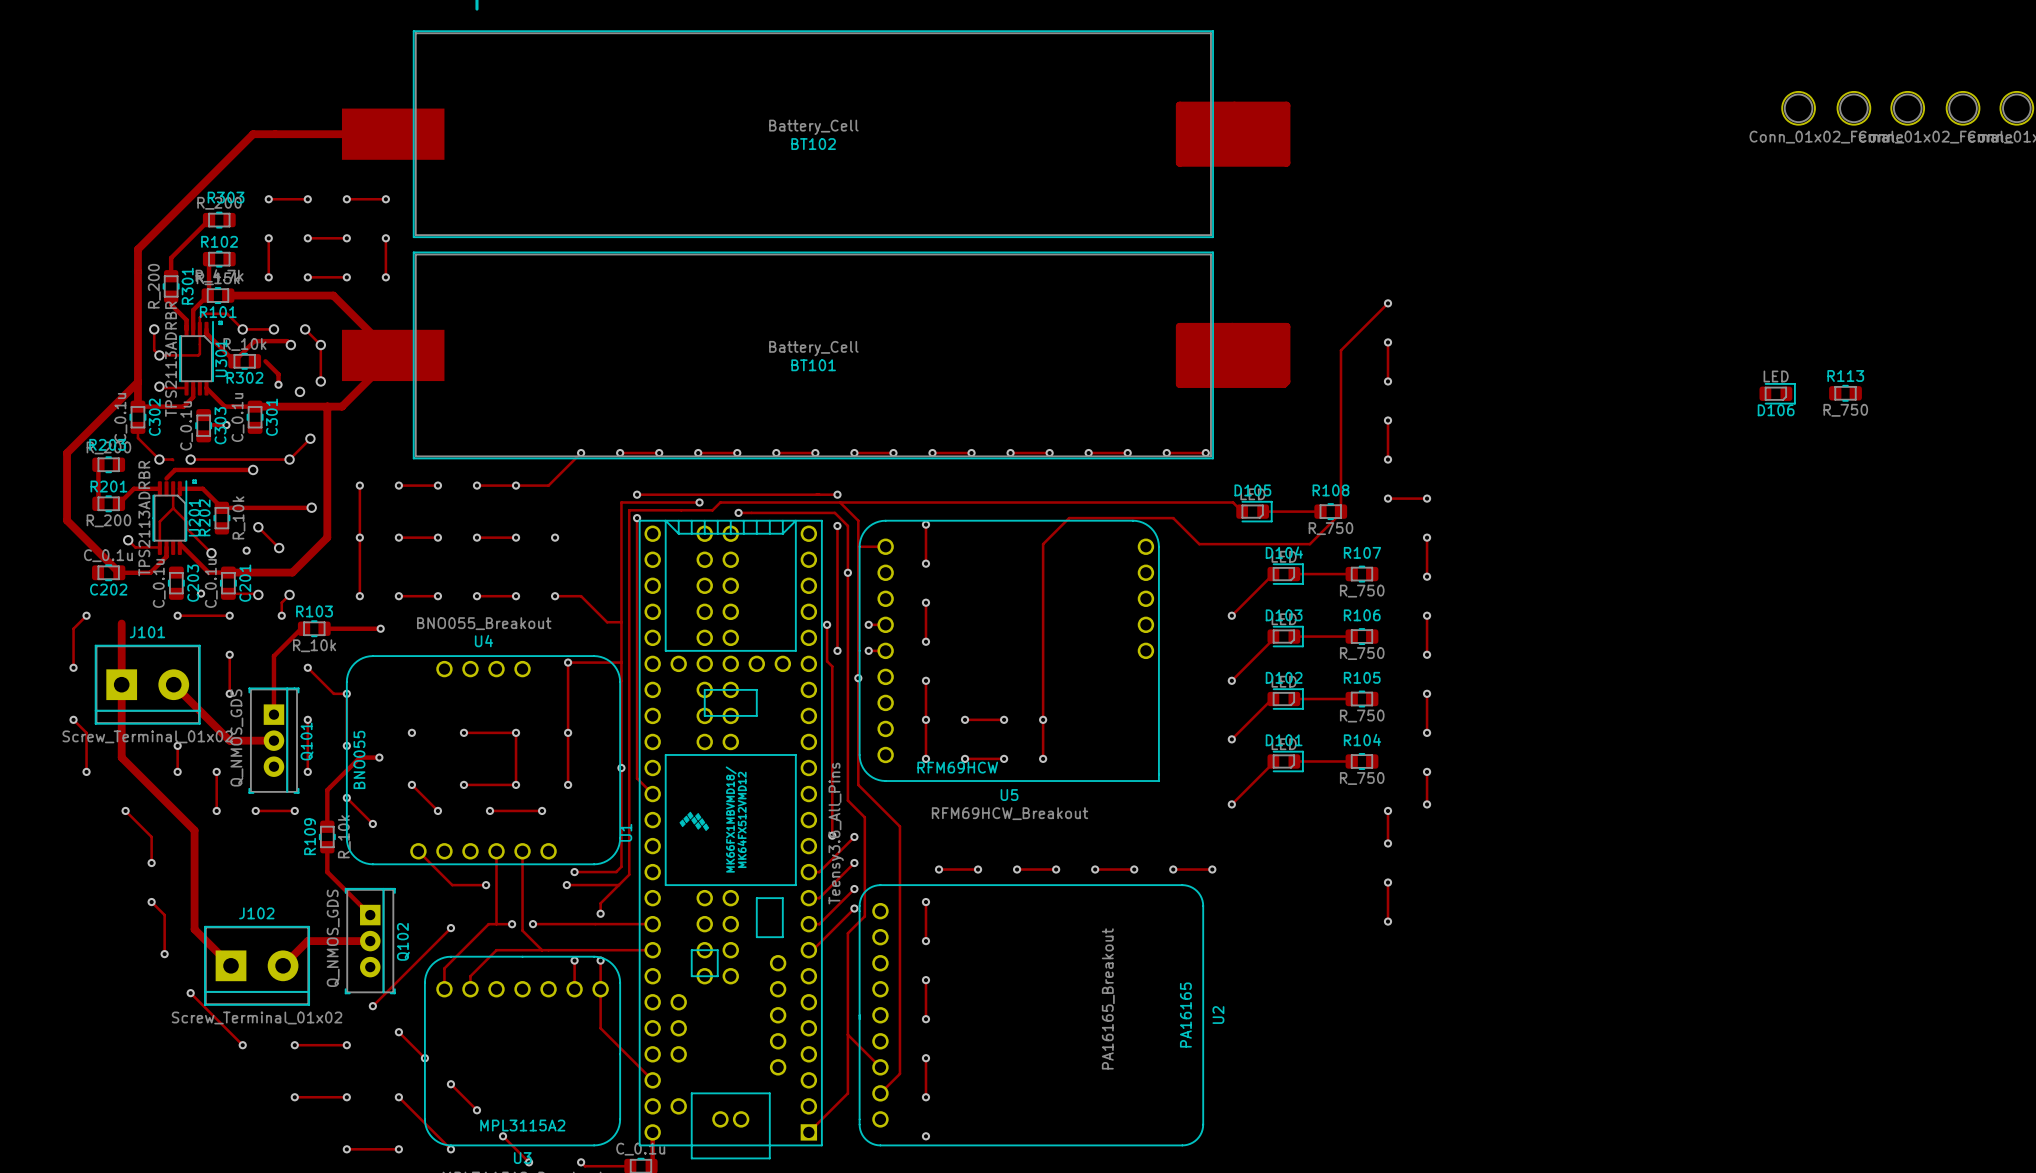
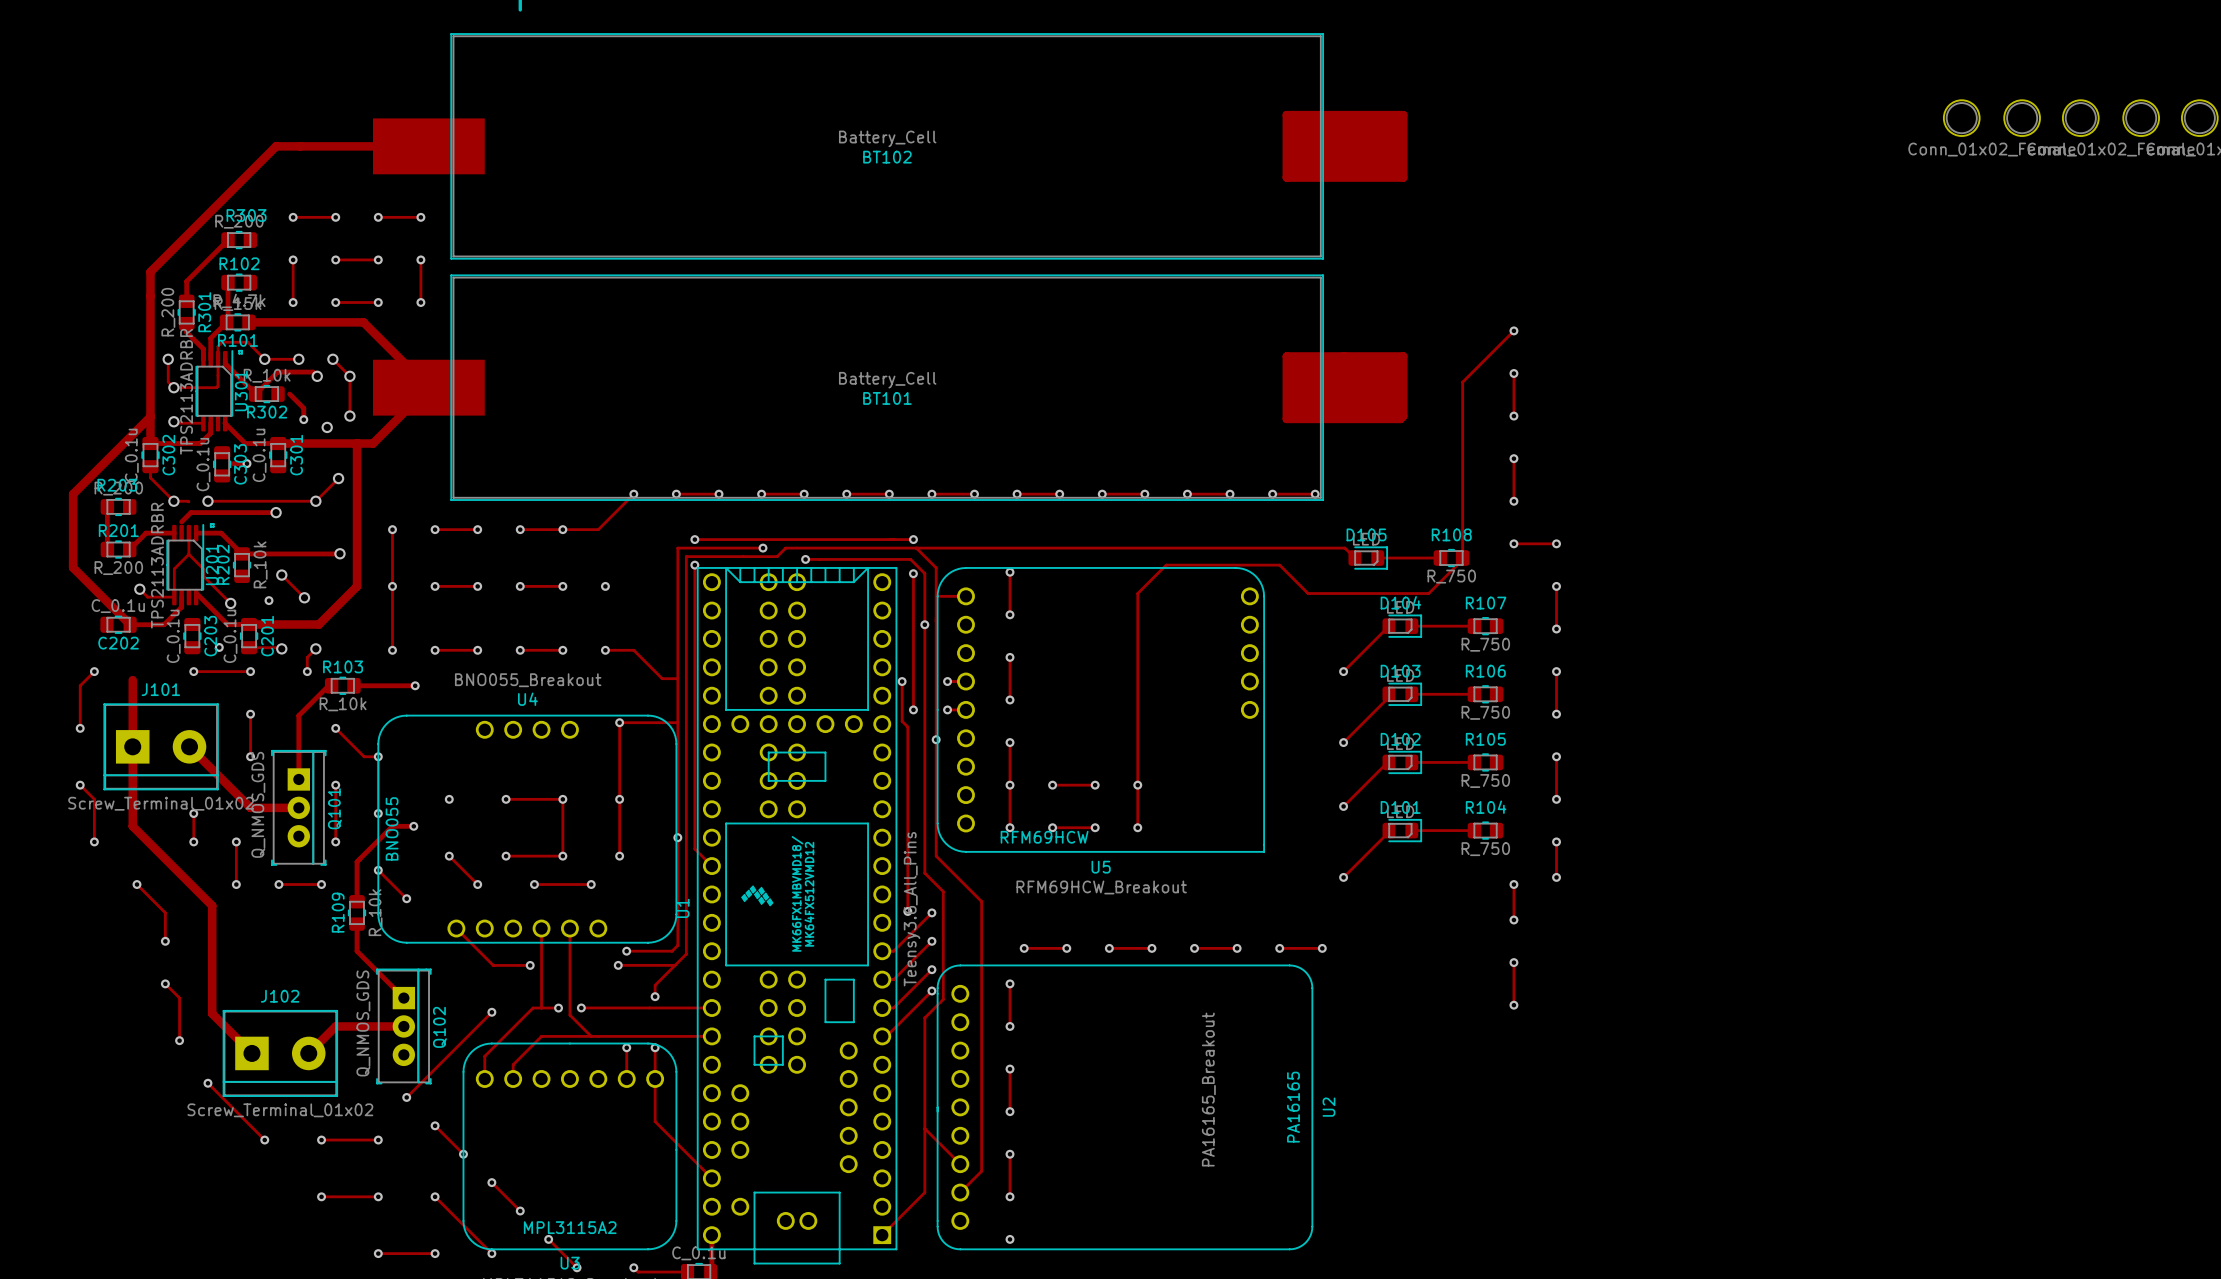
D106: LED (1777, 393) -> none
R113: R_750 (1845, 393) -> none

